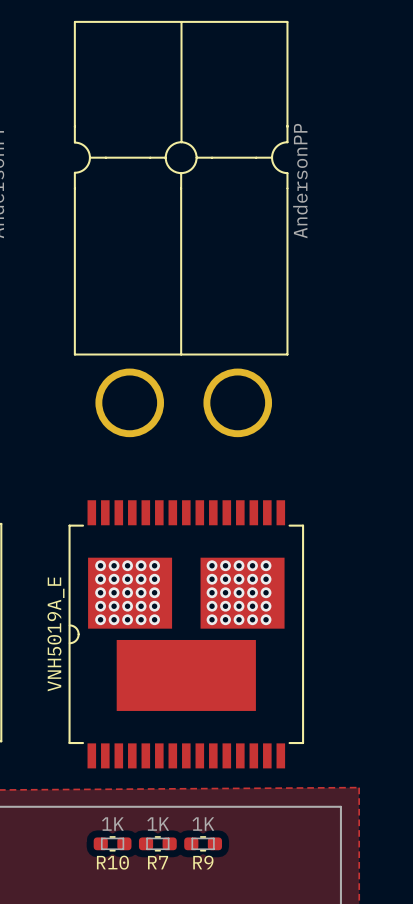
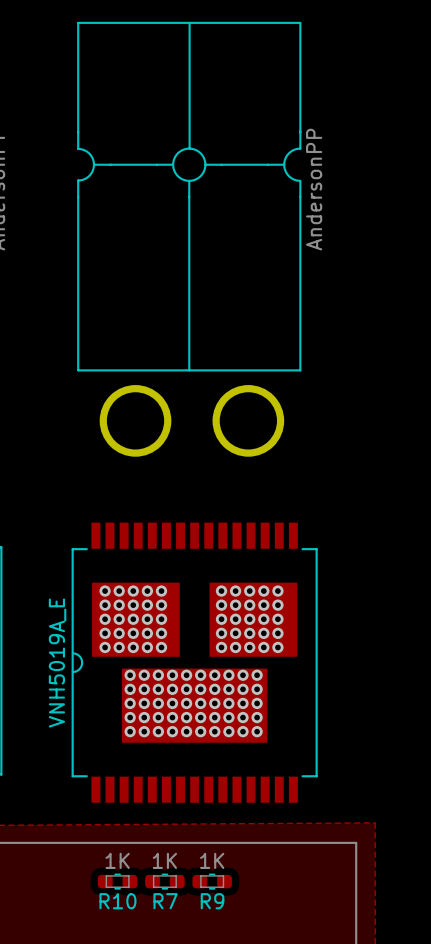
via: none -> (130, 675)
via: none -> (144, 675)
via: none -> (158, 675)
via: none -> (172, 675)
via: none -> (186, 675)
via: none -> (200, 675)
via: none -> (214, 675)
via: none -> (228, 675)
via: none -> (242, 675)
via: none -> (257, 675)
via: none -> (130, 689)
via: none -> (144, 689)
via: none -> (158, 689)
via: none -> (172, 689)
via: none -> (186, 689)
via: none -> (200, 689)
via: none -> (214, 689)
via: none -> (228, 689)
via: none -> (242, 689)
via: none -> (257, 689)
via: none -> (130, 703)
via: none -> (144, 703)
via: none -> (158, 703)
via: none -> (172, 703)
via: none -> (186, 703)
via: none -> (200, 703)
via: none -> (214, 703)
via: none -> (228, 703)
via: none -> (242, 703)
via: none -> (257, 703)
via: none -> (130, 717)
via: none -> (144, 717)
via: none -> (158, 717)
via: none -> (172, 717)
via: none -> (186, 717)
via: none -> (200, 717)
via: none -> (214, 717)
via: none -> (228, 717)
via: none -> (242, 717)
via: none -> (257, 717)
via: none -> (130, 731)
via: none -> (144, 731)
via: none -> (158, 731)
via: none -> (172, 731)
via: none -> (186, 731)
via: none -> (200, 731)
via: none -> (214, 731)
via: none -> (228, 731)
via: none -> (242, 731)
via: none -> (257, 731)

